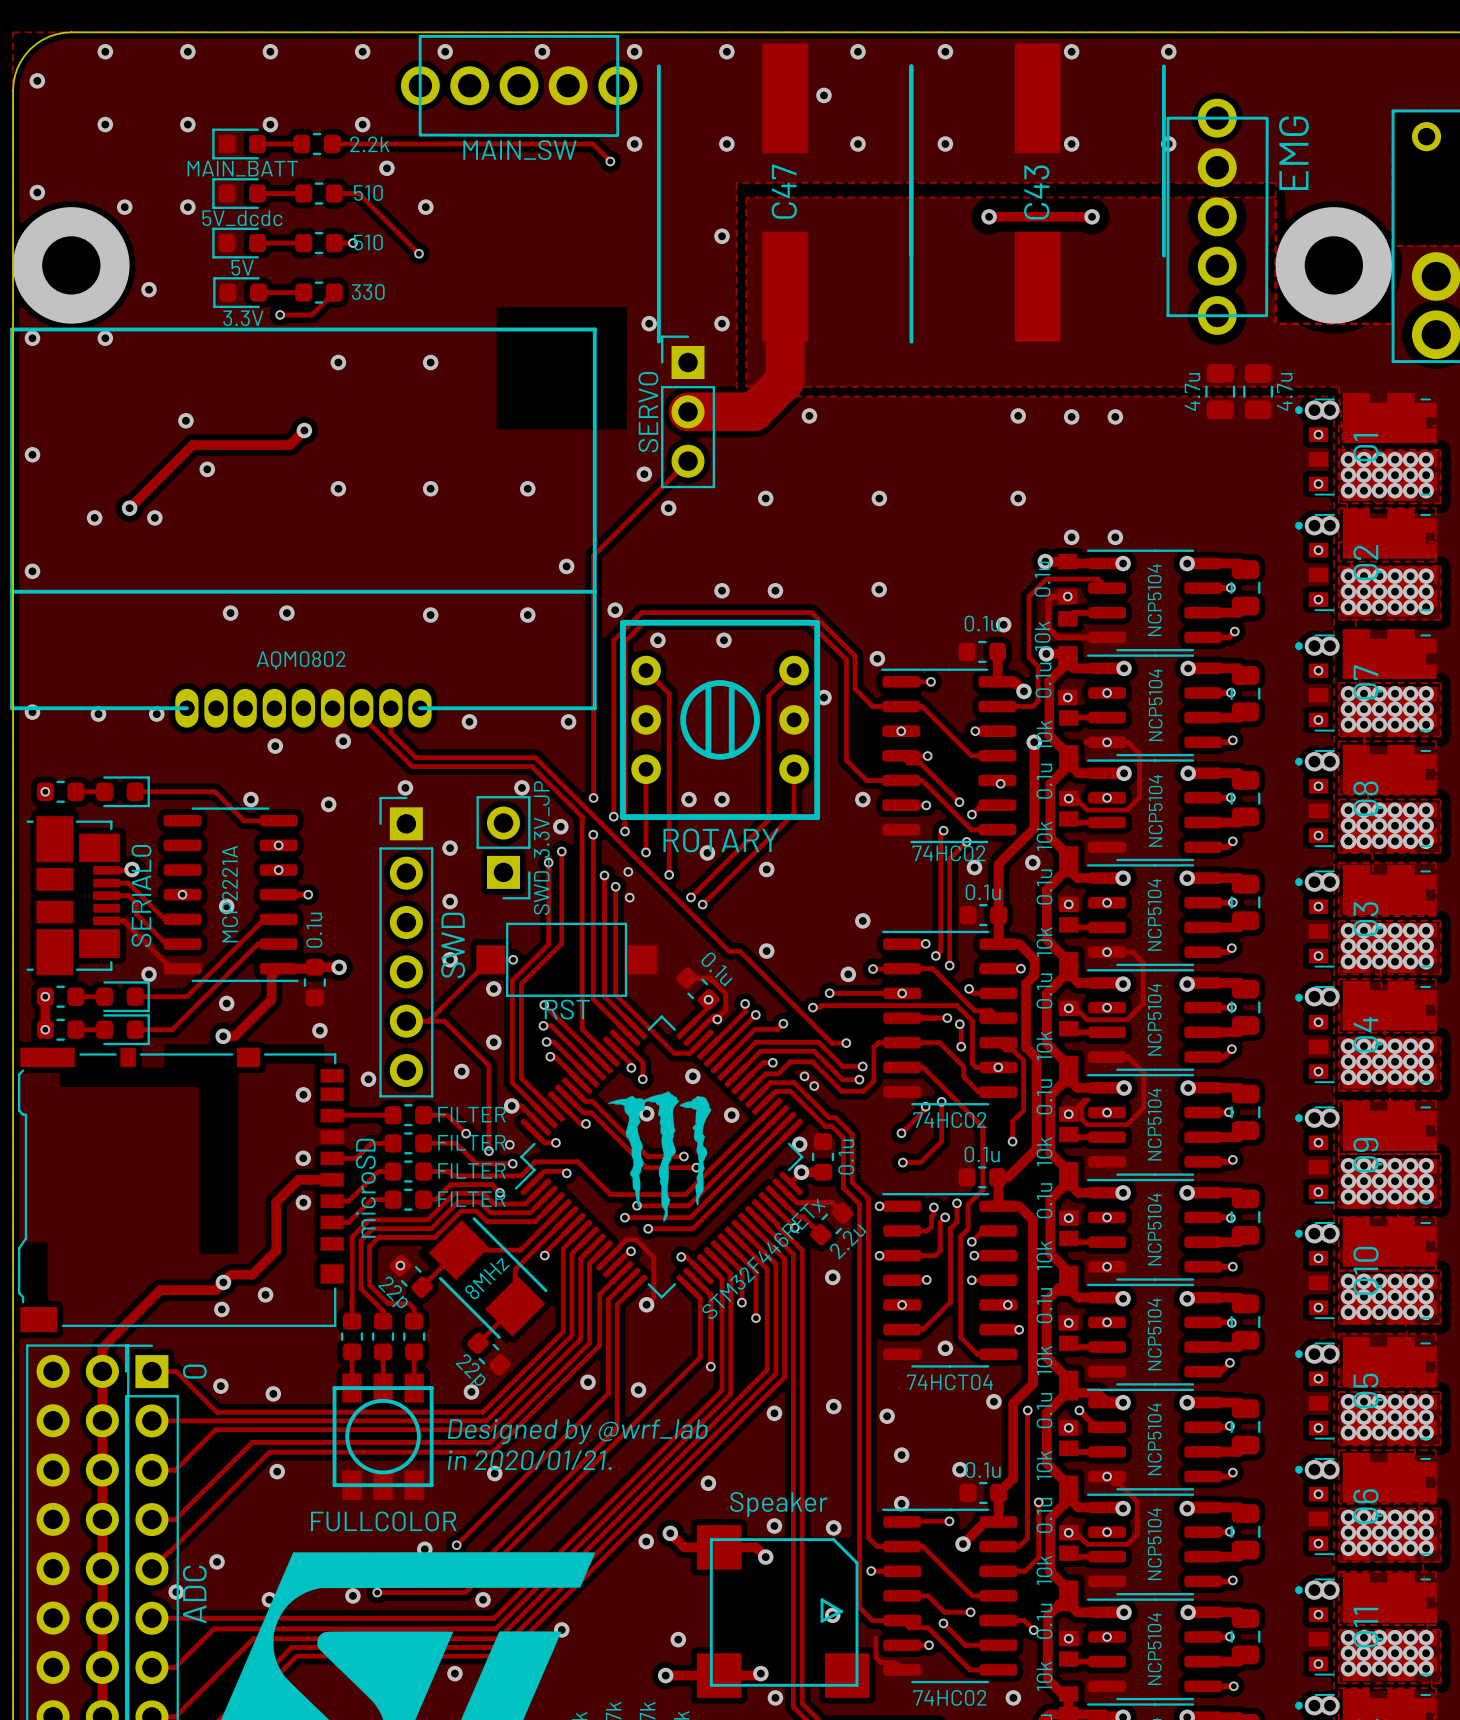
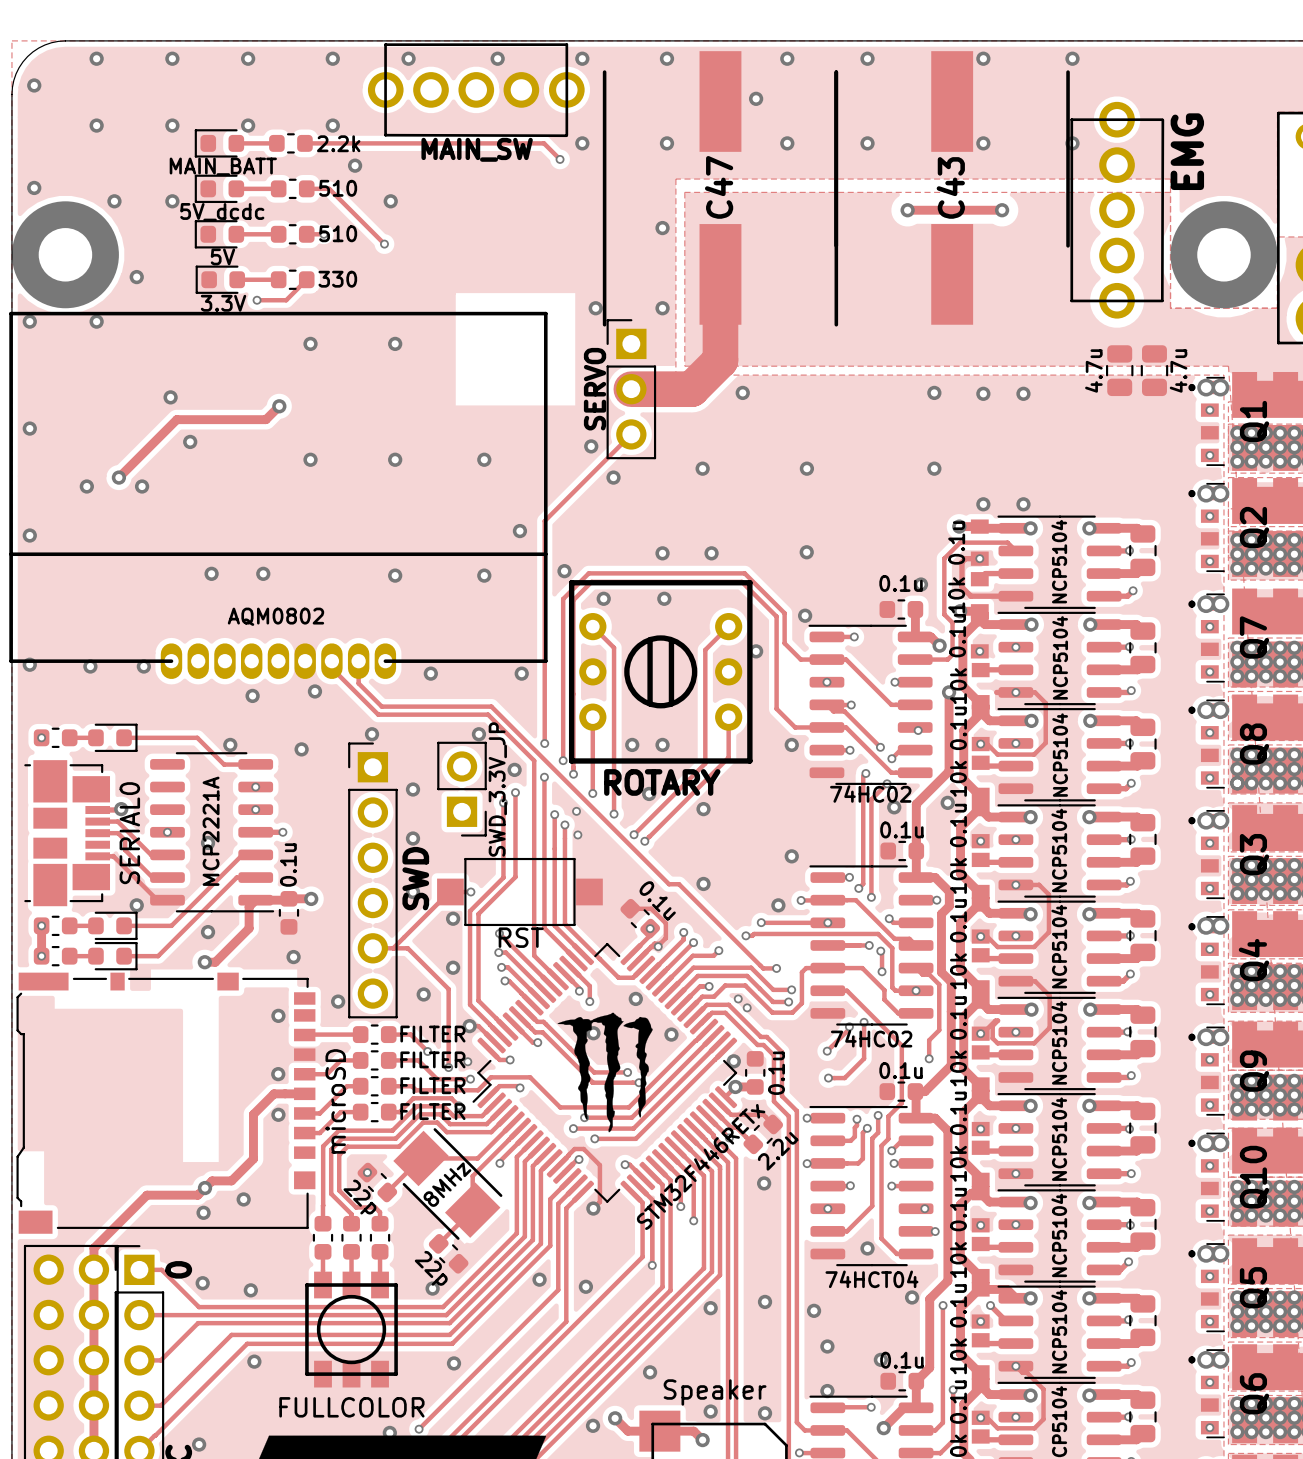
text: Designed by @wrf_lab (577, 1431) -> none
text: in 2020/01/21. (529, 1460) -> none

